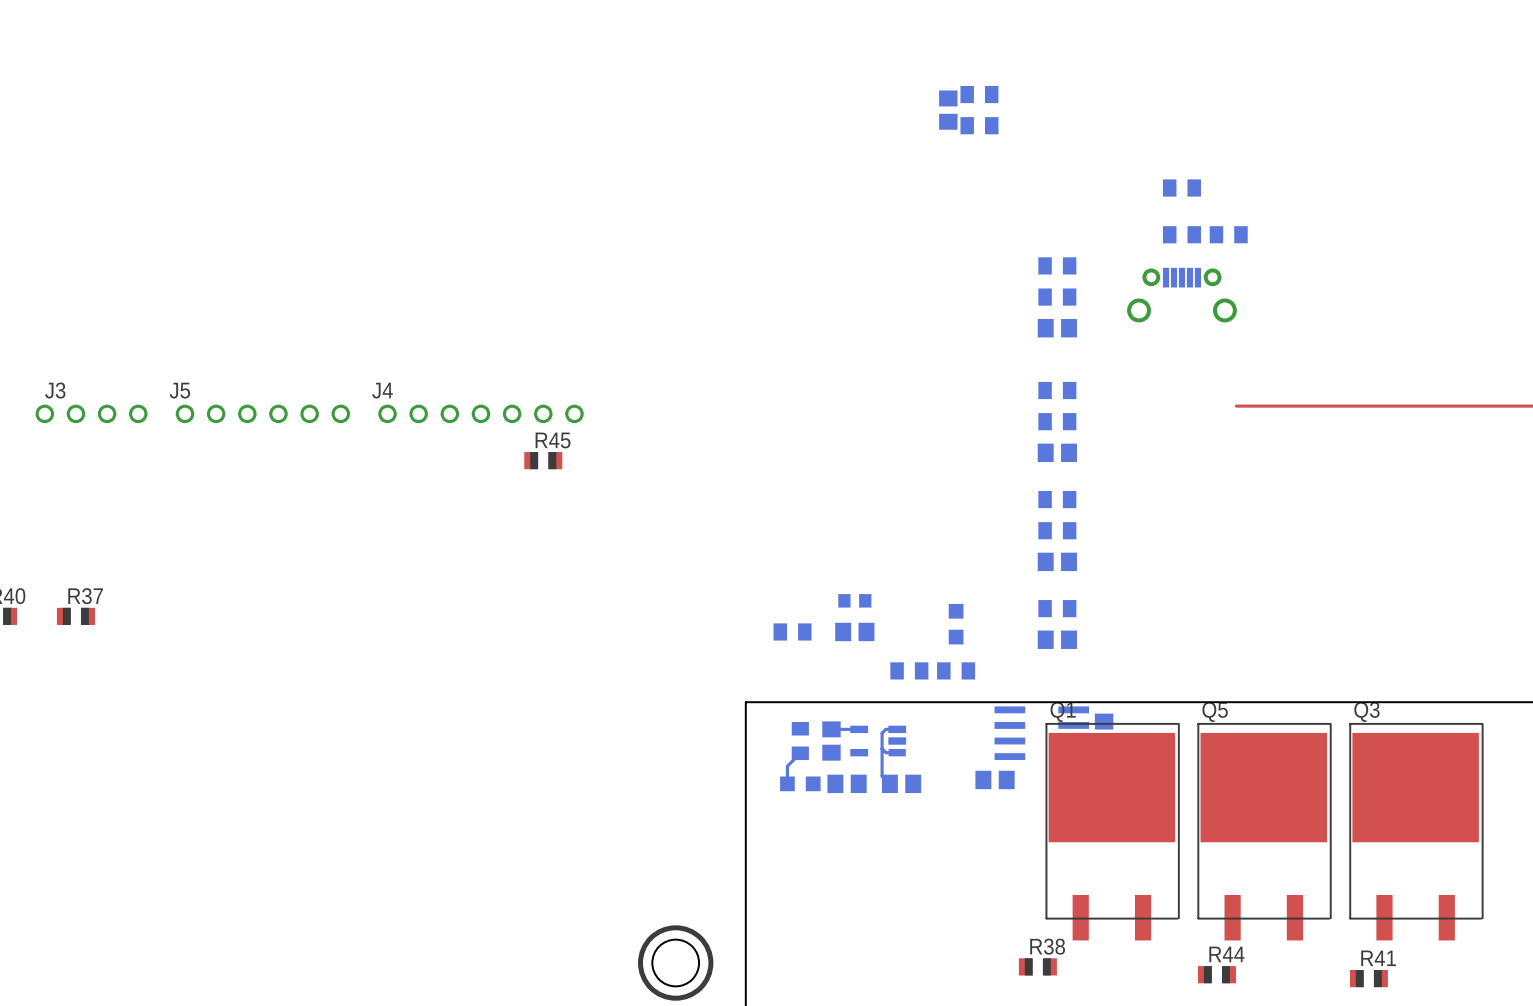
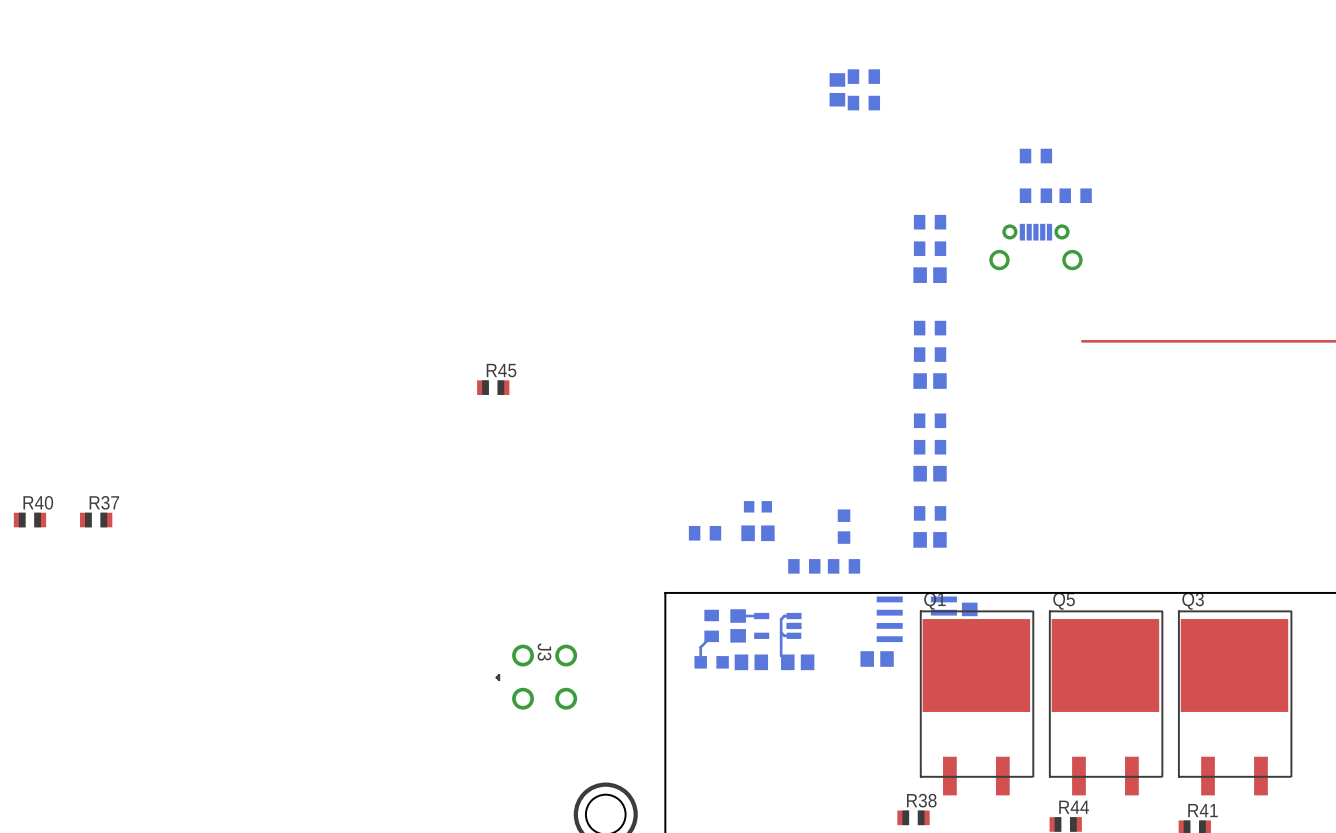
J3 name position: J3 (55, 390) -> J3 (544, 652)
J3 footprint: [35, 404, 148, 424] -> [495, 644, 578, 710]
J5: (262, 413) -> none
J4: (480, 413) -> none

